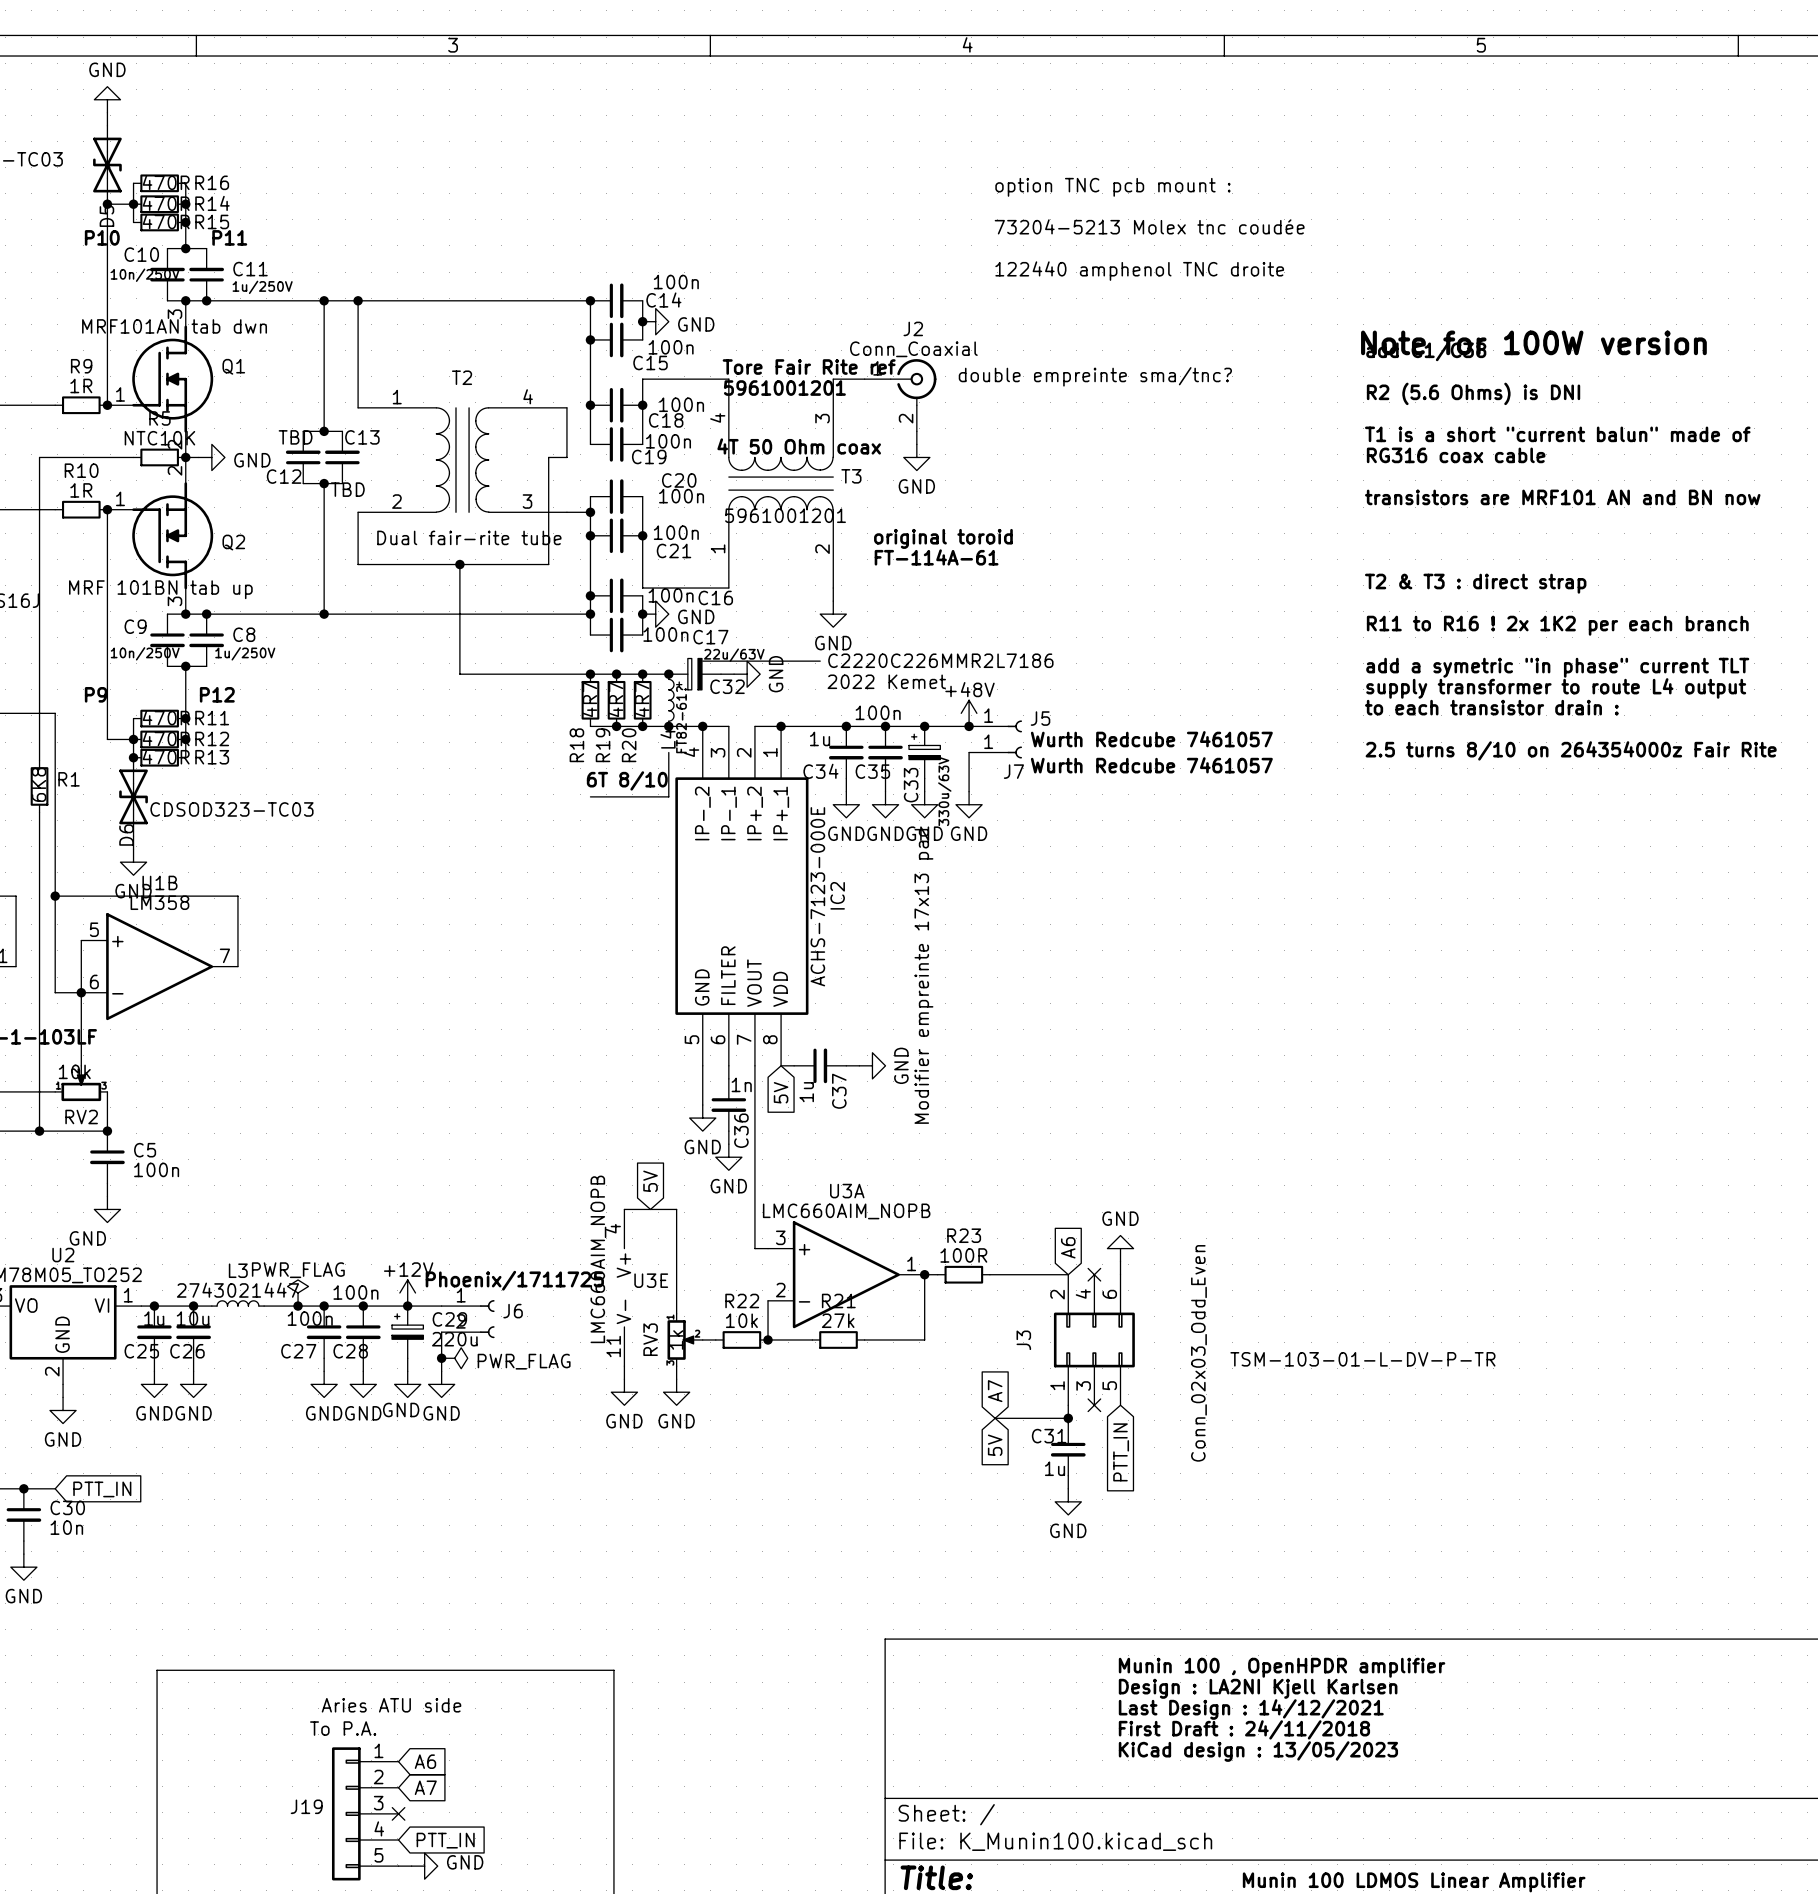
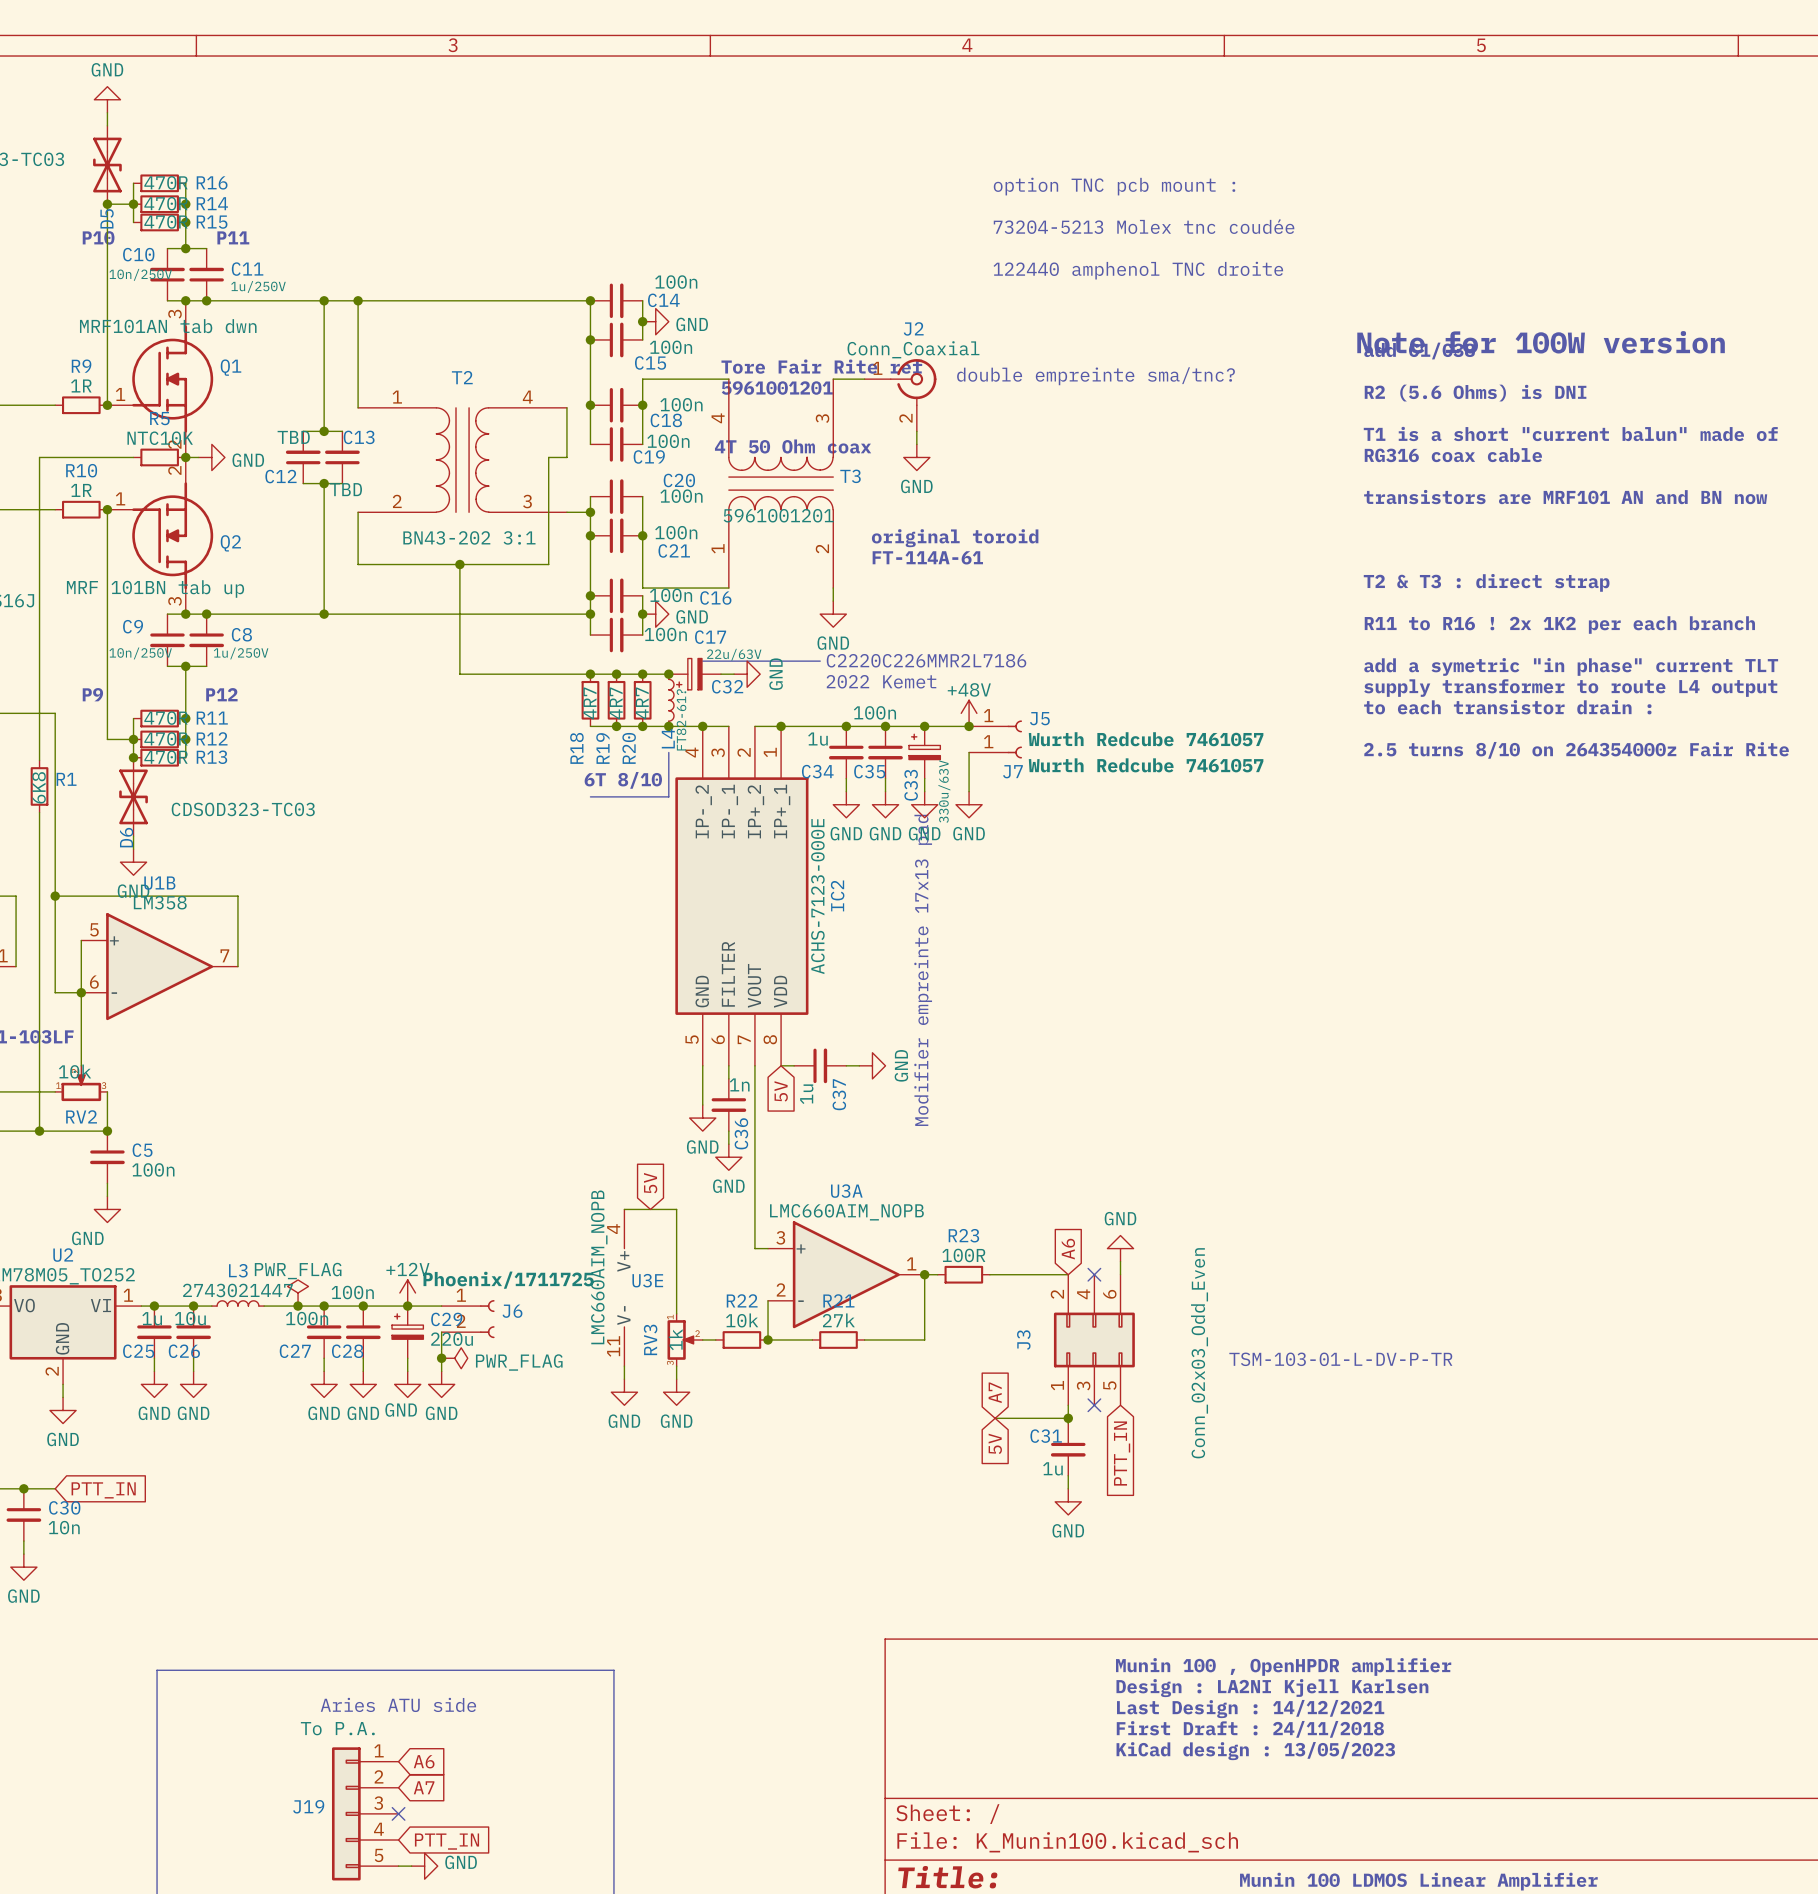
T2 value: Dual fair-rite tube (469, 537) -> BN43-202 3:1 (469, 537)

